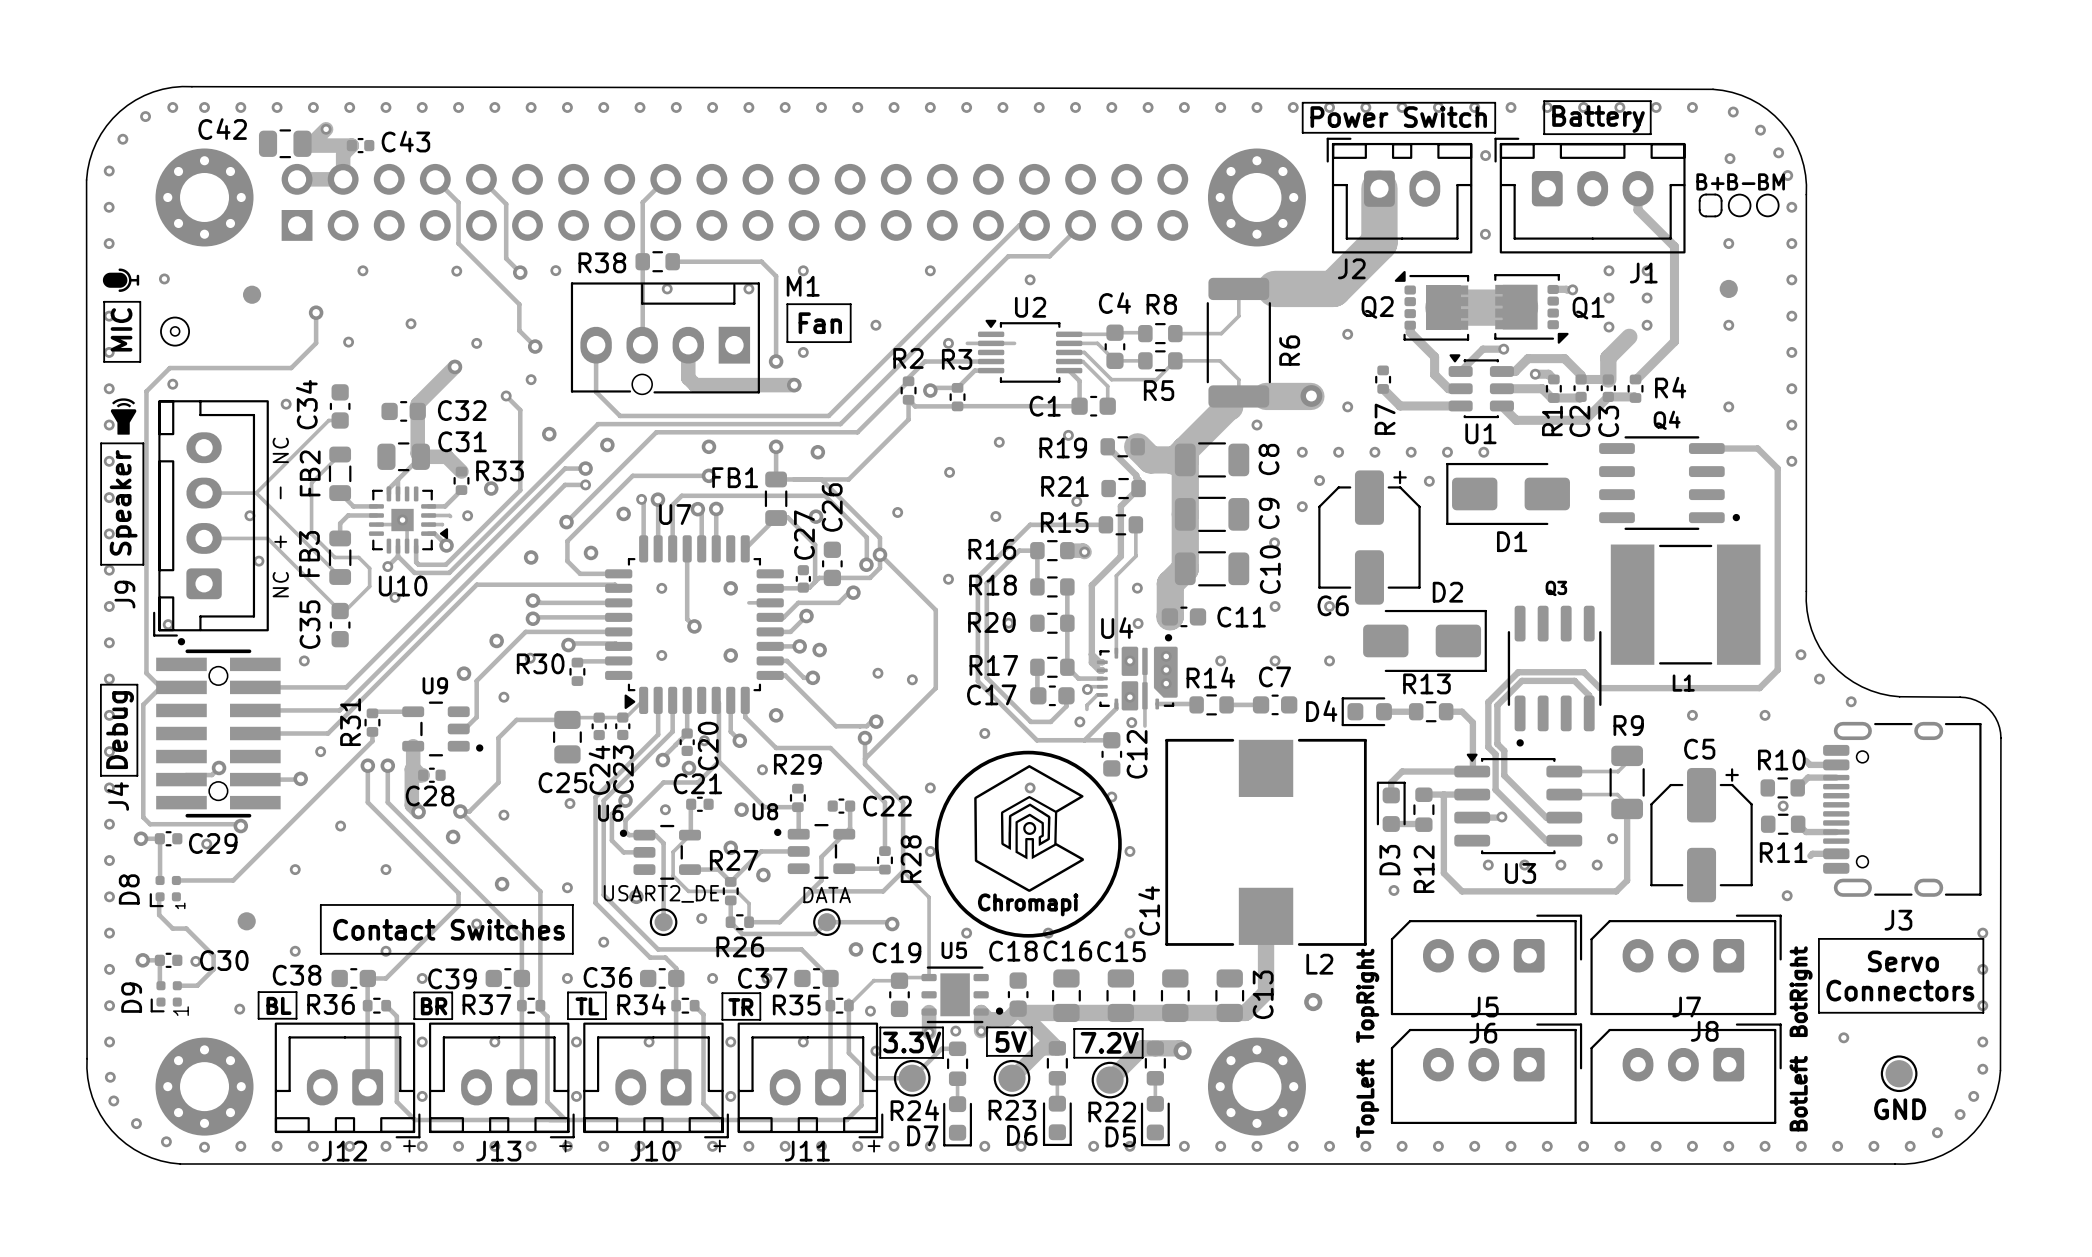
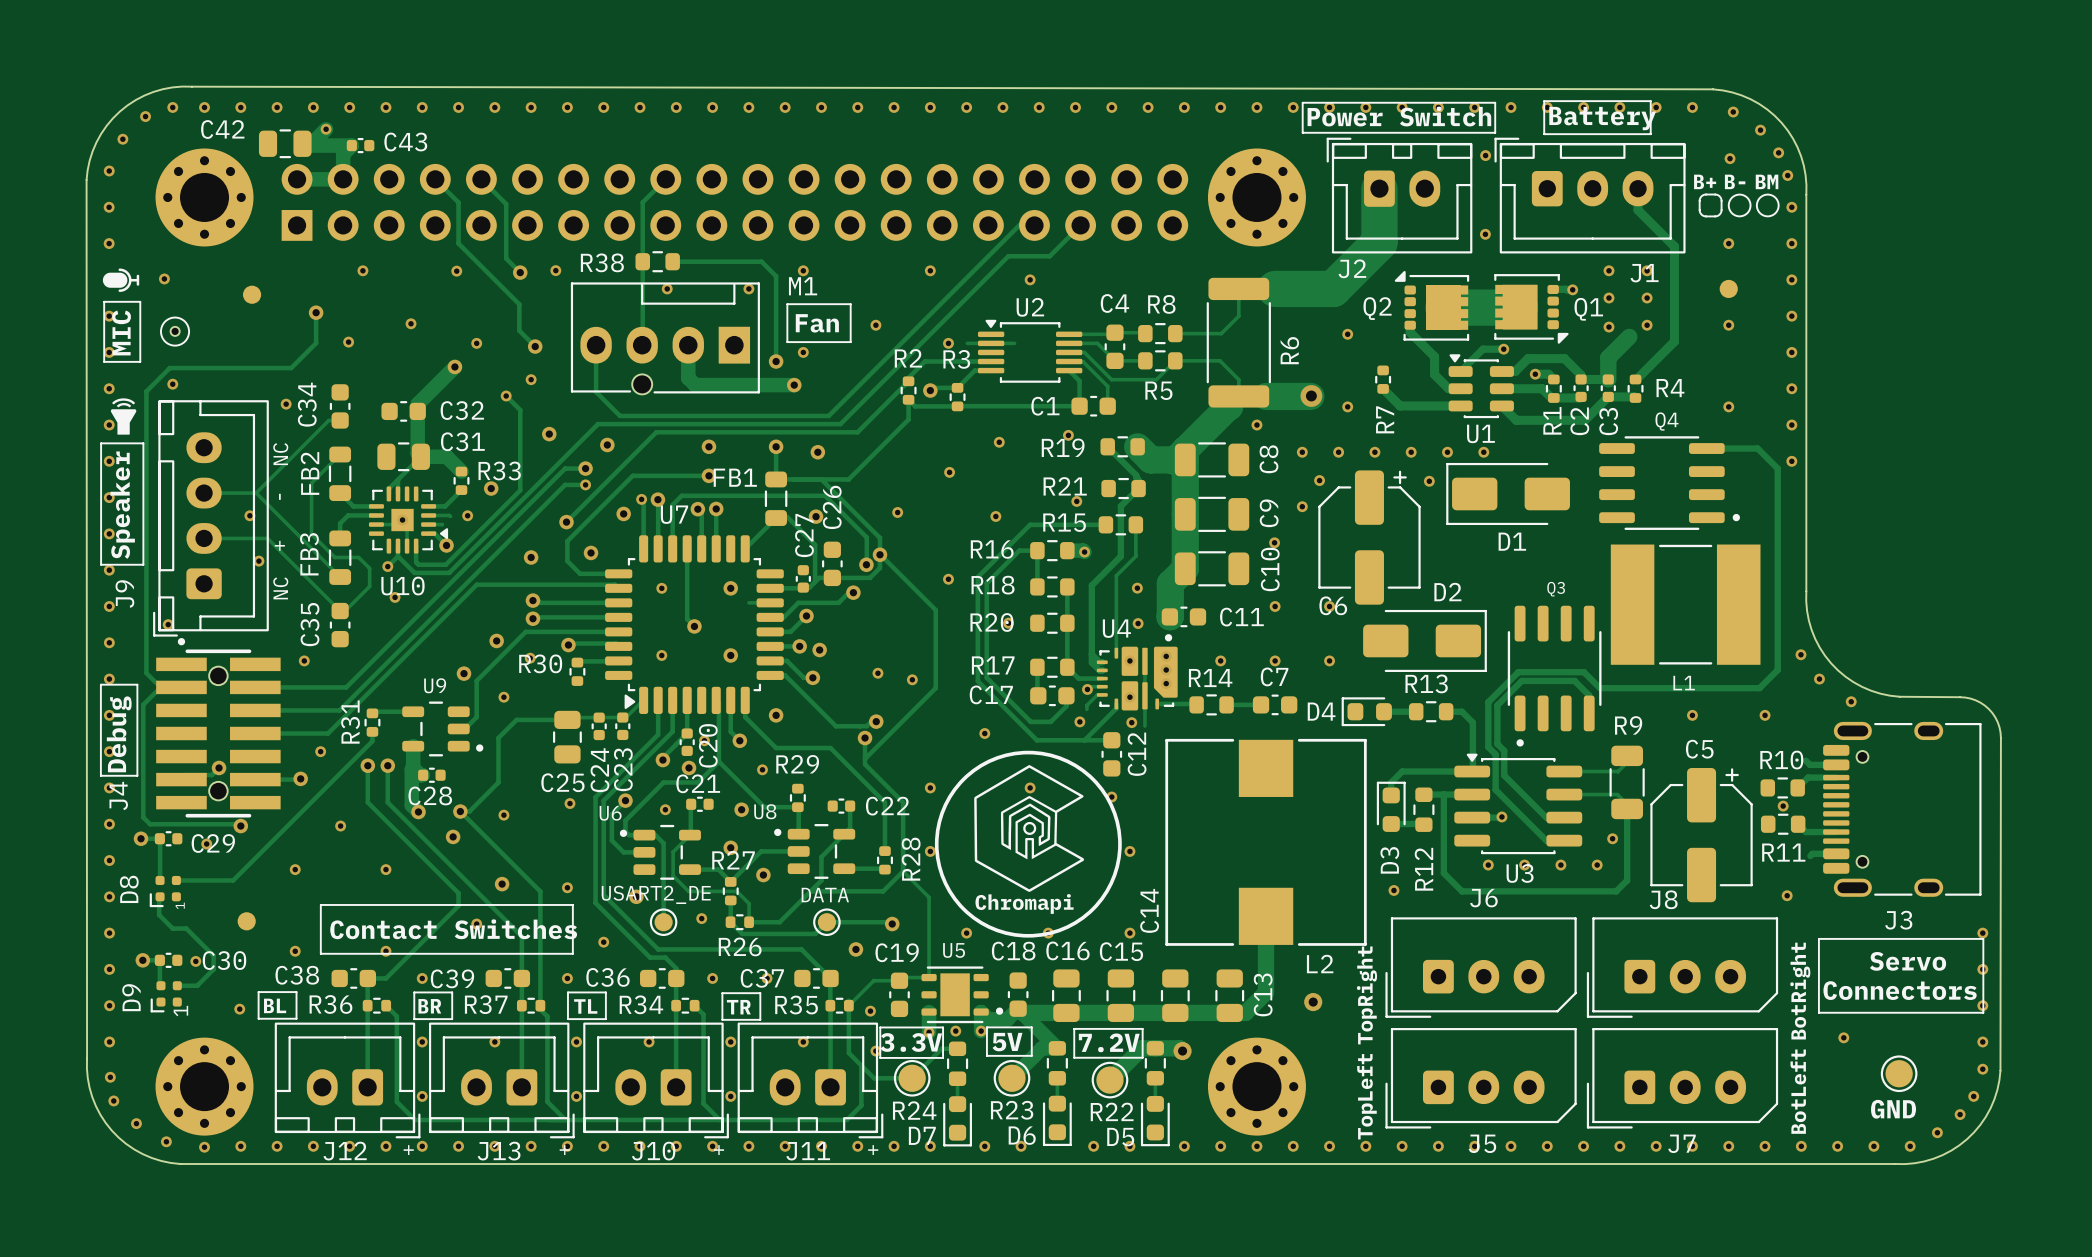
J6 rotation: 0° (1486, 964) -> 180° (1481, 967)
J8 rotation: 0° (1686, 964) -> 180° (1682, 967)
J5 rotation: 0° (1486, 1073) -> 180° (1481, 1078)
J7 rotation: 0° (1686, 1073) -> 180° (1682, 1078)

